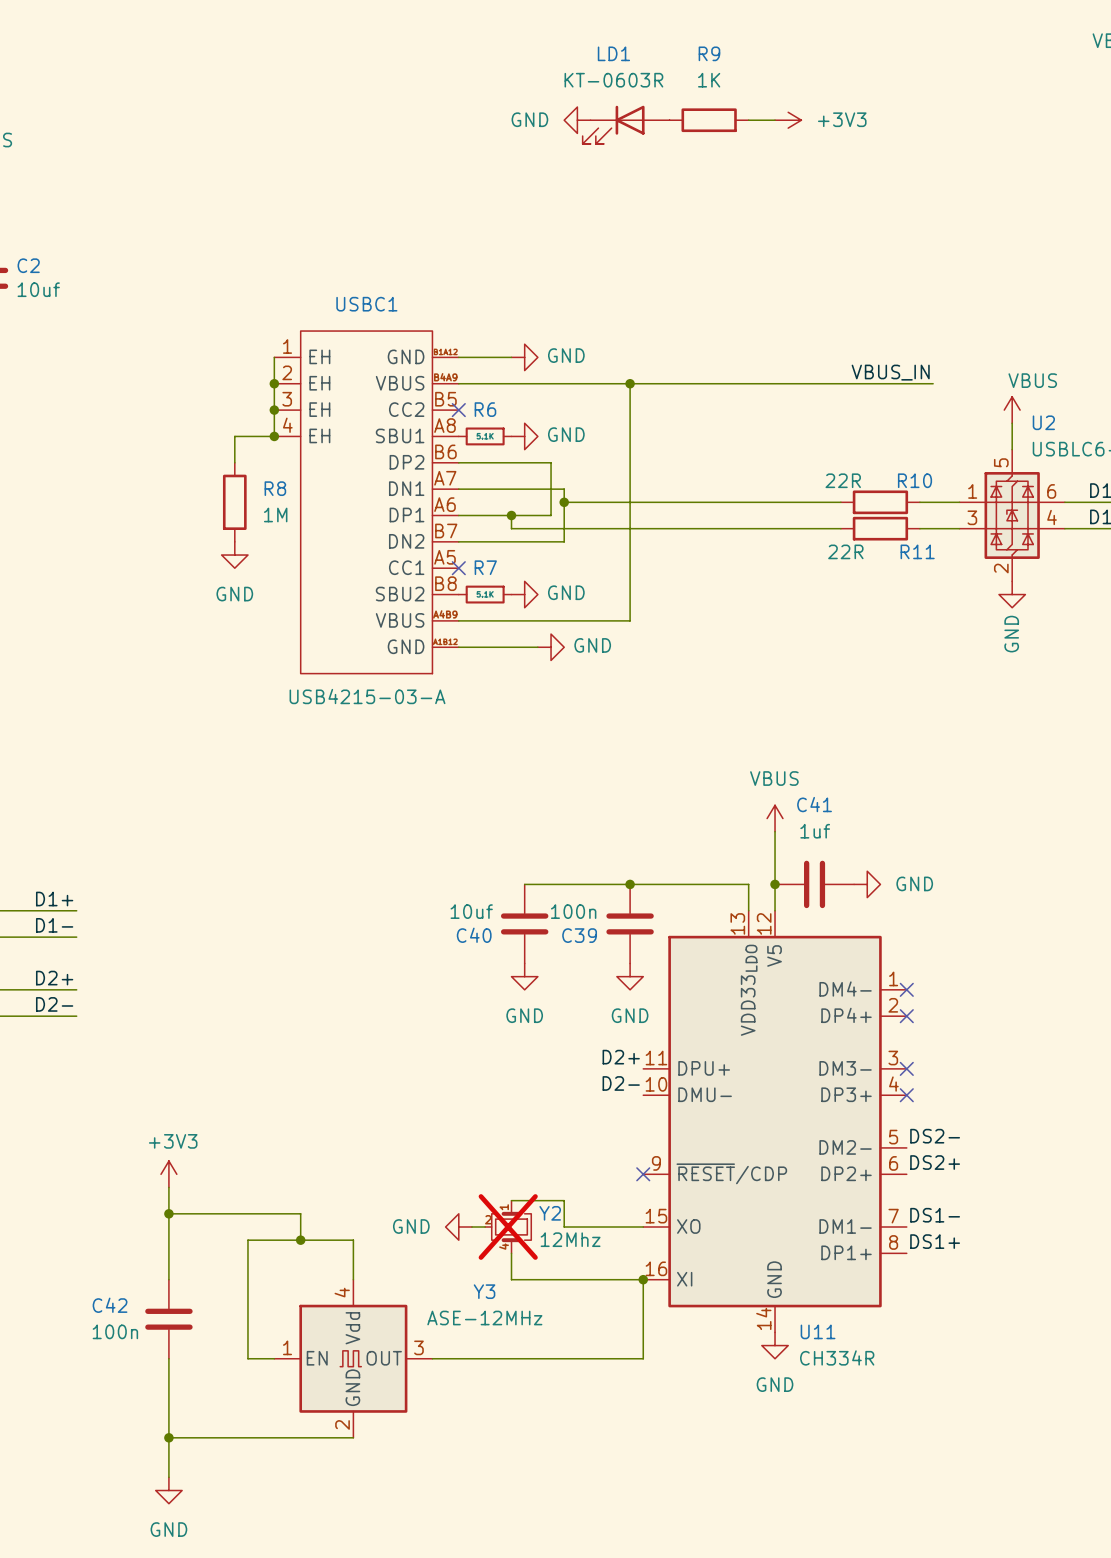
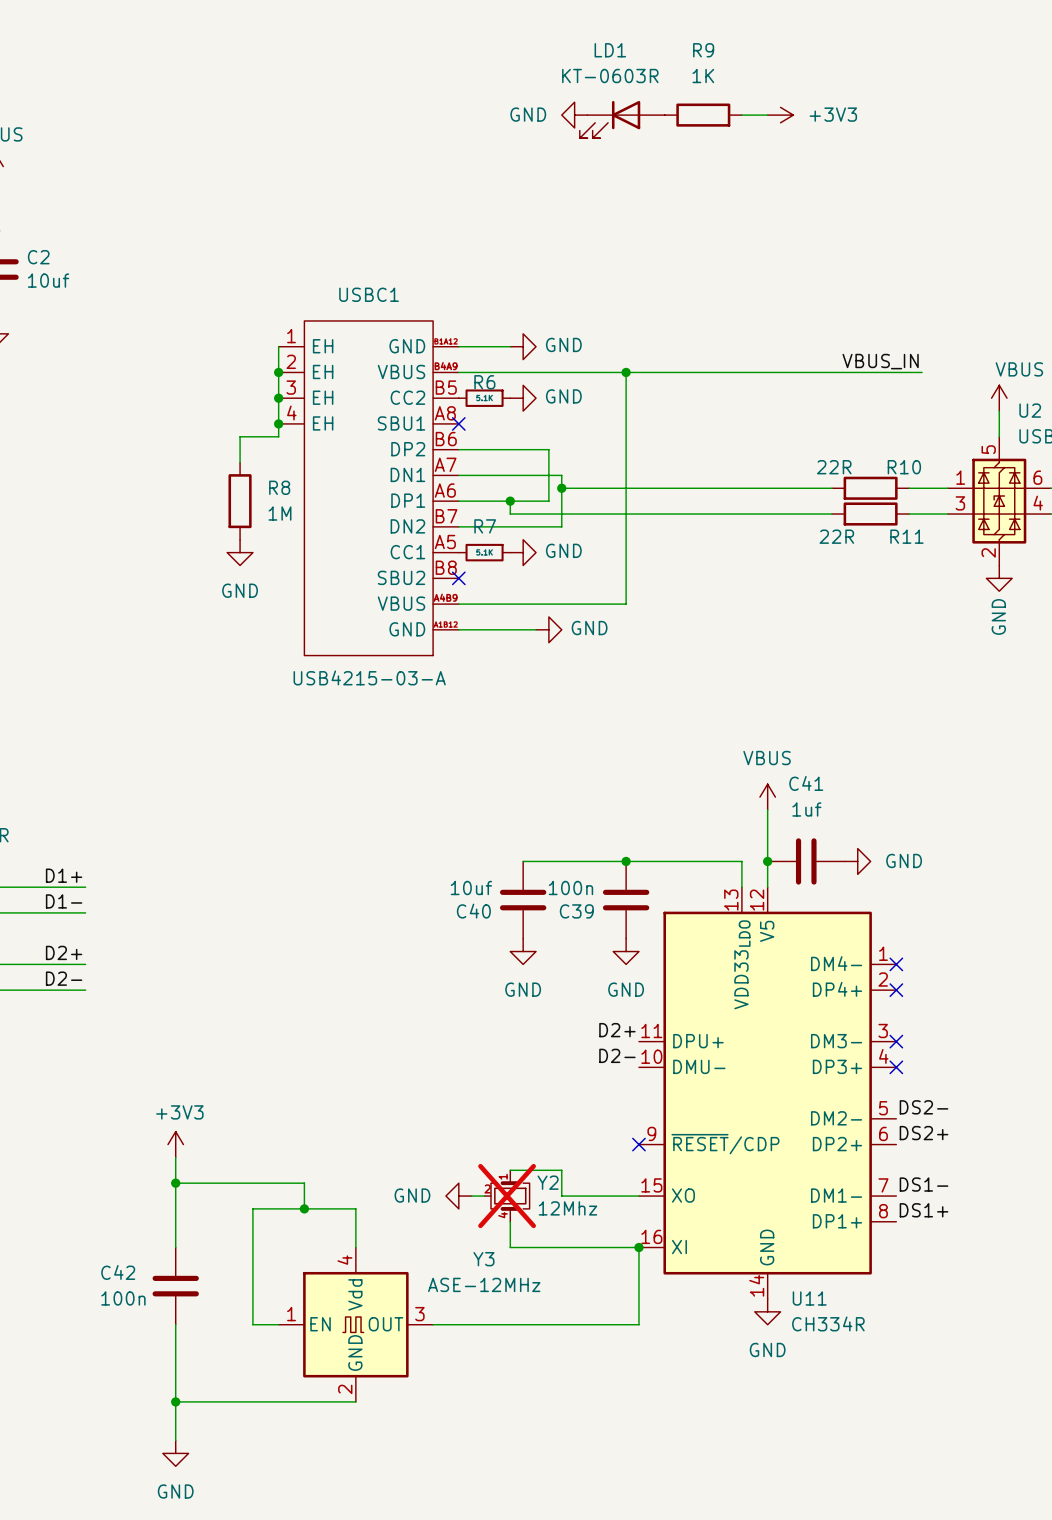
R6 name position: R6 (485, 409) -> R6 (484, 382)
no-connect mark position: (458, 410) -> (458, 423)
wire: (274, 436) (234, 436) (234, 449) -> (278, 423) (278, 436) (240, 436)
R6 position: (485, 436) -> (484, 398)
power symbol position: GND (524, 436) -> GND (523, 398)
R8 position: (234, 502) -> (240, 501)
power symbol position: GND (234, 555) -> GND (240, 552)
no-connect mark position: (458, 568) -> (458, 578)
R7 position: (485, 594) -> (484, 552)
power symbol position: GND (524, 594) -> GND (523, 552)

